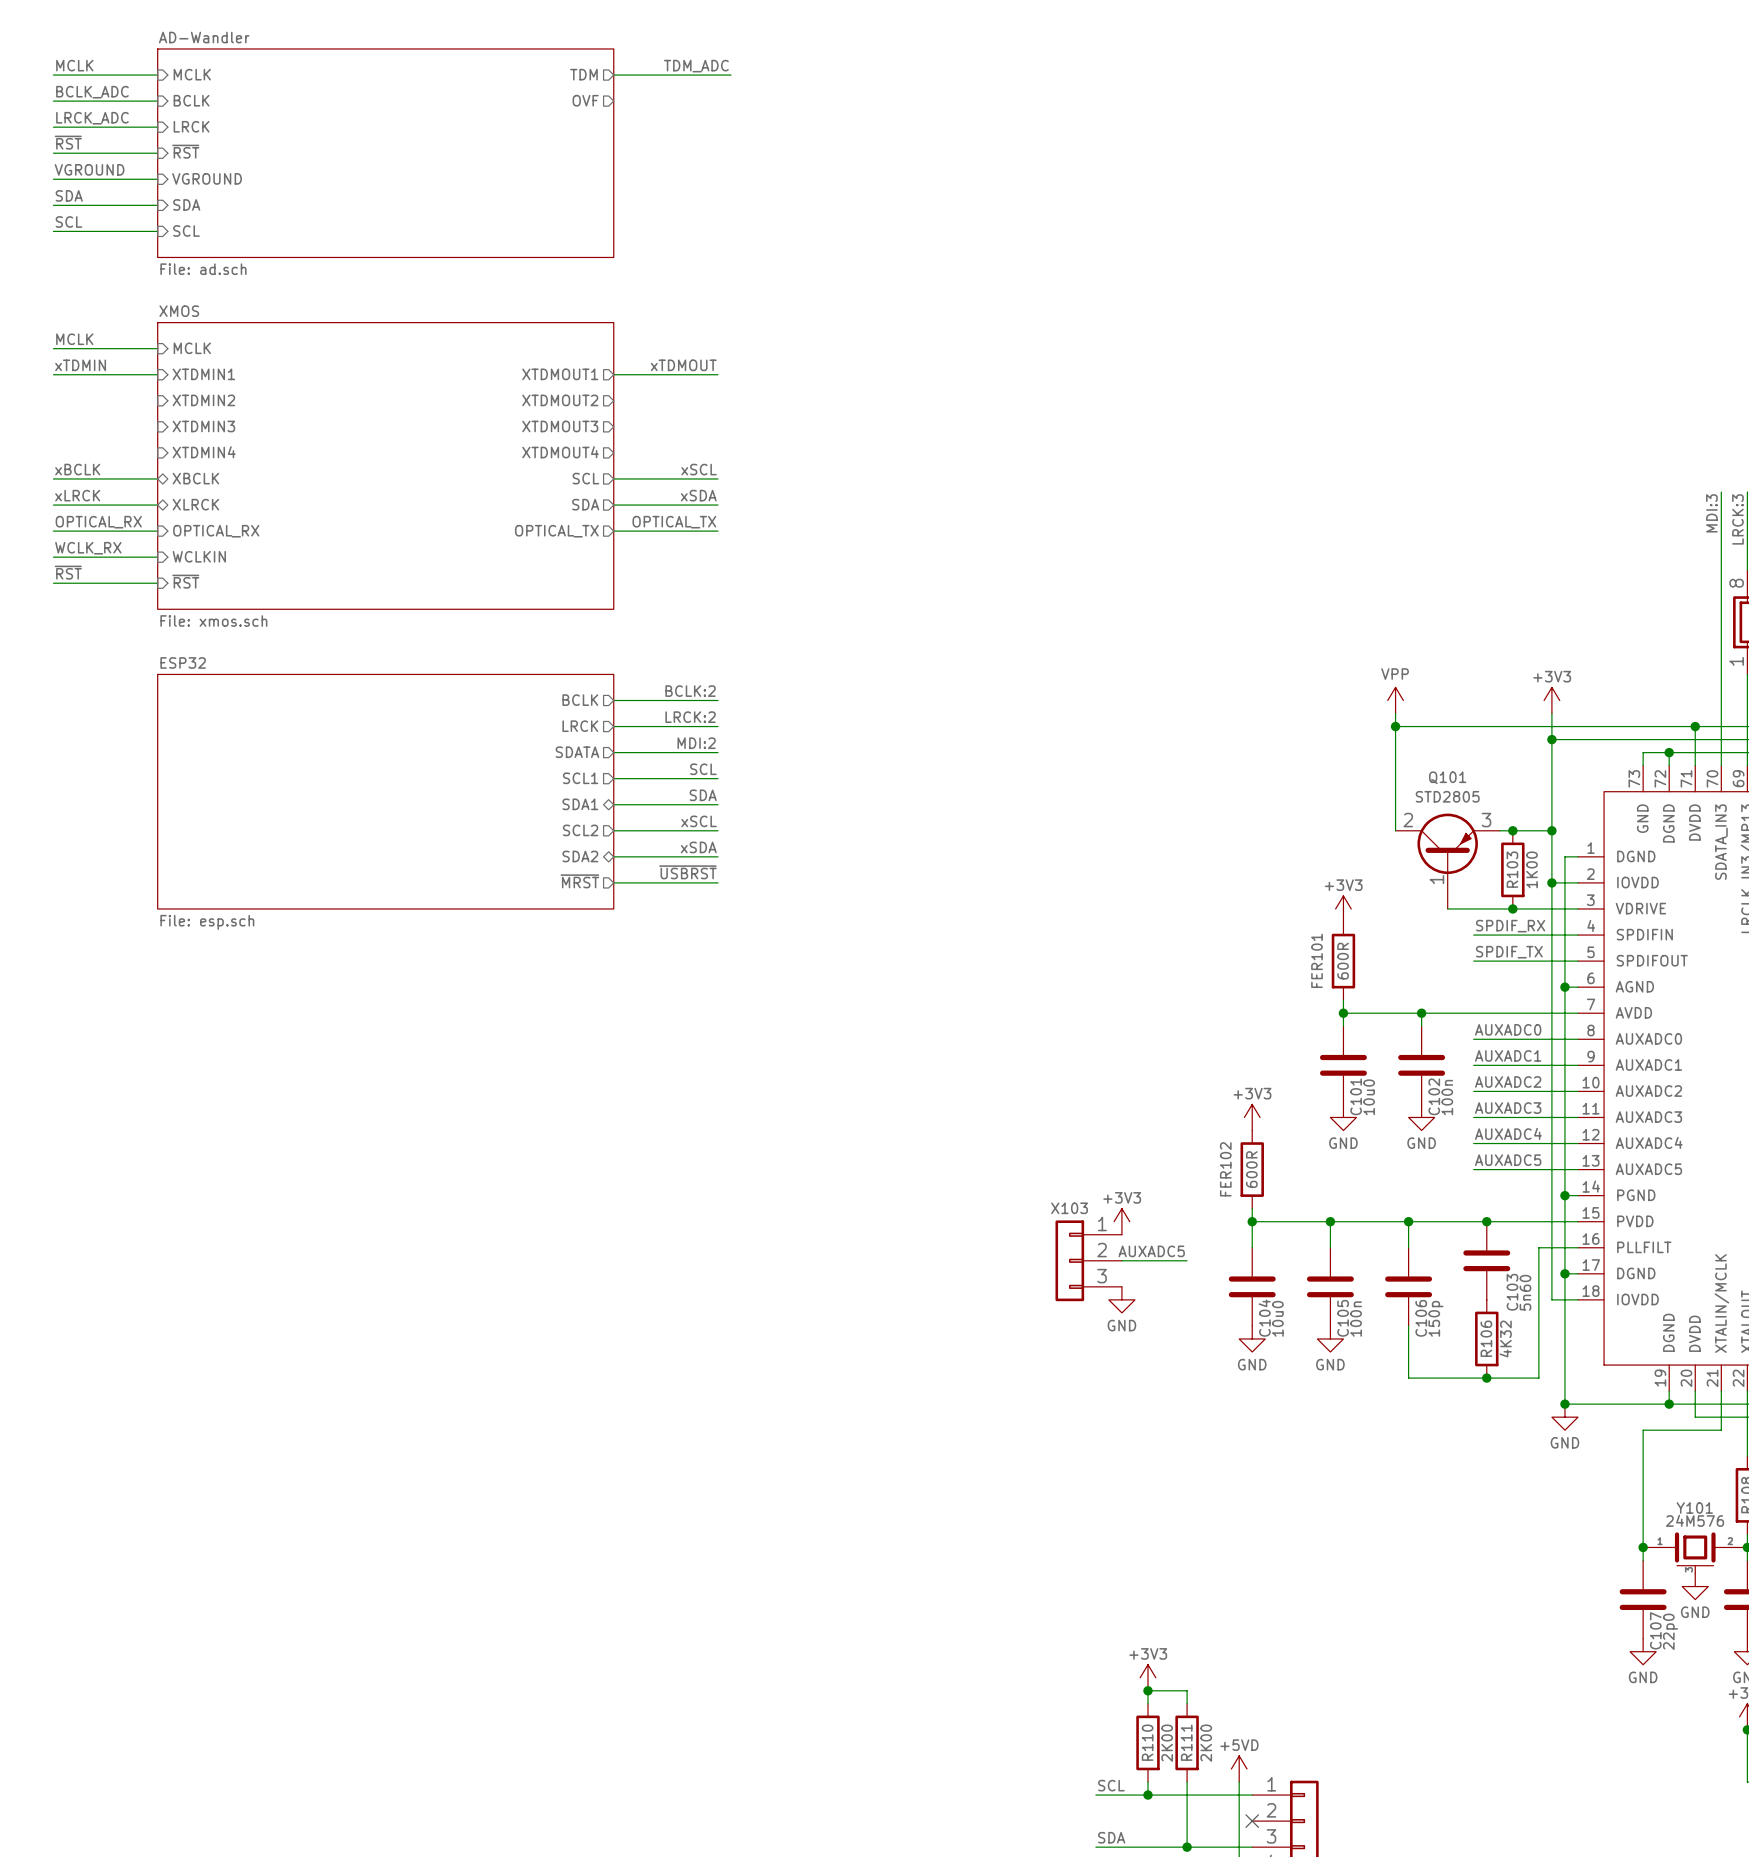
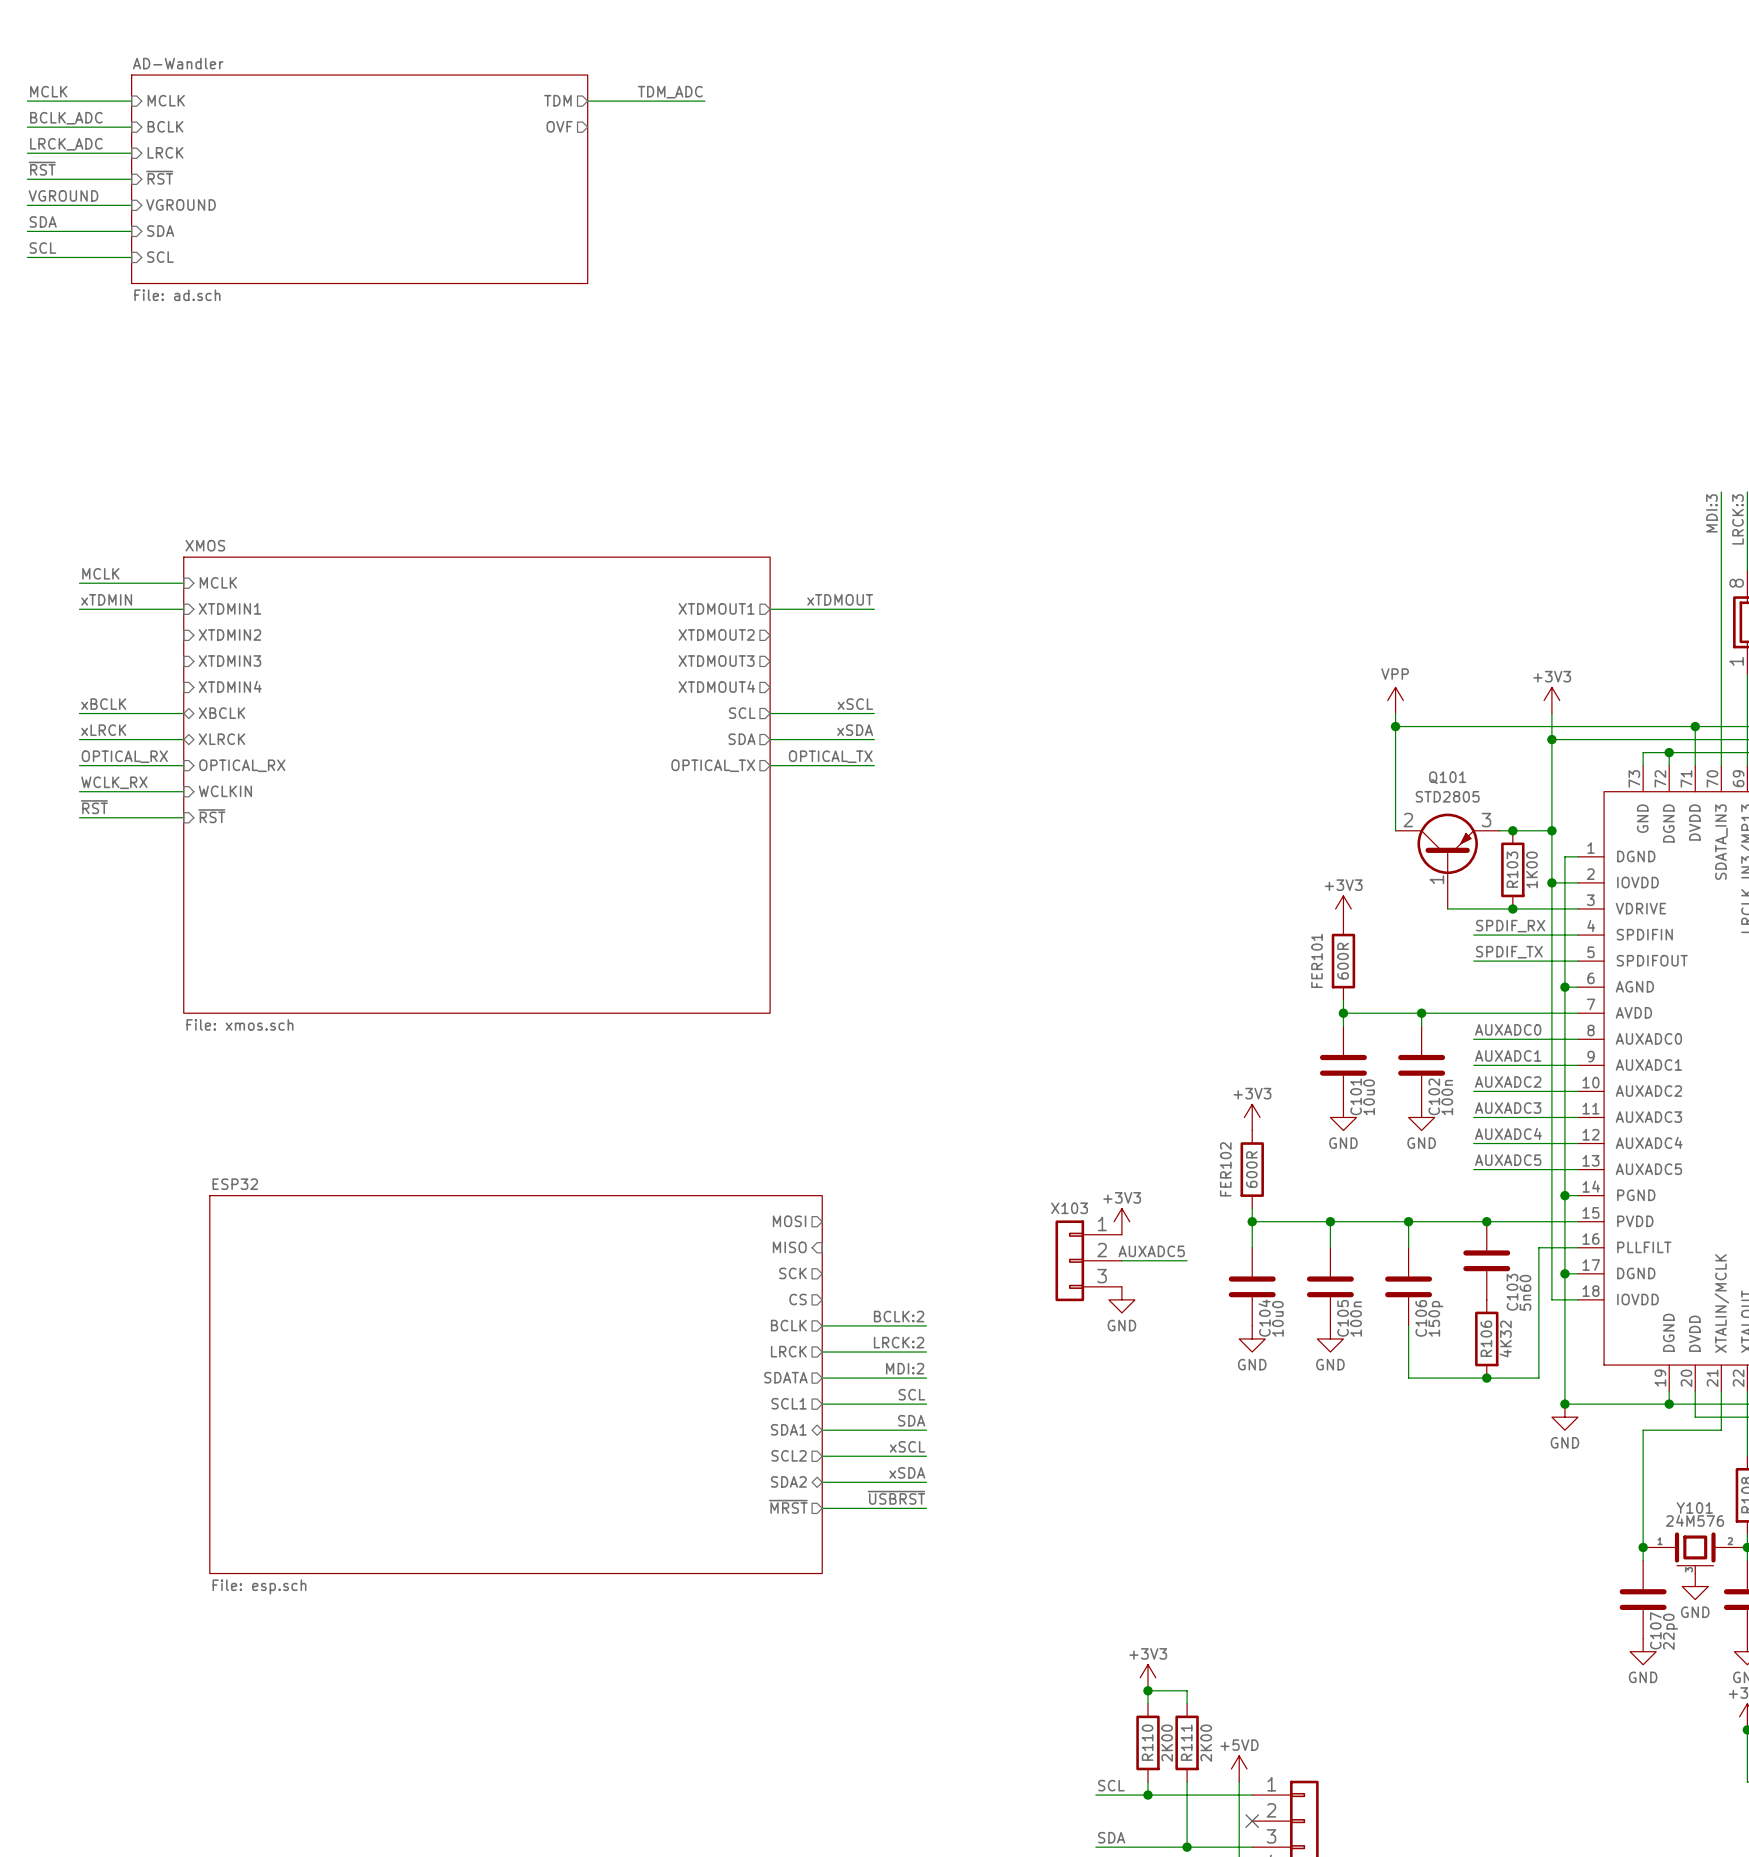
label position: MCLK (74, 65) -> MCLK (48, 91)
label position: TDM_ADC (696, 66) -> TDM_ADC (670, 92)
sheet pin position: MCLK (192, 74) -> MCLK (166, 100)
sheet pin position: TDM (583, 74) -> TDM (557, 100)
wire: (53, 75) (157, 75) -> none
wire: (613, 75) (731, 75) -> (587, 101) (704, 101)
label position: BCLK_ADC (92, 92) -> BCLK_ADC (66, 118)
sheet pin position: BCLK (191, 100) -> BCLK (165, 126)
sheet pin position: OVF (585, 100) -> OVF (559, 126)
wire: (131, 101) (157, 101) -> (27, 101) (53, 101)
label position: LRCK_ADC (92, 118) -> LRCK_ADC (66, 144)
sheet pin position: LRCK (191, 126) -> LRCK (165, 152)
wire: (131, 127) (157, 127) -> (27, 127) (53, 127)
label position: ~{RST} (68, 142) -> ~{RST} (42, 168)
sheet pin position: ~{RST} (185, 151) -> ~{RST} (159, 177)
wire: (131, 153) (157, 153) -> (27, 153) (53, 153)
sheet AD-Wandler position: (385, 153) -> (359, 179)
label position: VGROUND (89, 169) -> VGROUND (63, 195)
sheet pin position: VGROUND (207, 178) -> VGROUND (180, 204)
wire: (131, 179) (157, 179) -> (27, 179) (53, 179)
label position: SDA (69, 195) -> SDA (43, 221)
sheet pin position: SDA (186, 204) -> SDA (160, 231)
wire: (131, 205) (157, 205) -> (27, 205) (53, 205)
label position: SCL (68, 221) -> SCL (42, 248)
wire: (131, 231) (157, 231) -> (27, 231) (53, 231)
sheet pin position: SCL (186, 231) -> SCL (160, 257)
label: MCLK (74, 339) -> none
wire: (53, 348) (157, 348) -> (27, 257) (131, 257)
sheet pin: MCLK (192, 348) -> none
label position: xTDMIN (80, 365) -> xTDMIN (106, 599)
label: xTDMOUT (683, 365) -> none
wire: (53, 374) (157, 374) -> (79, 609) (183, 609)
sheet pin position: XTDMIN1 (203, 374) -> XTDMIN1 (229, 608)
sheet pin: XTDMOUT1 (560, 374) -> none
wire: (613, 374) (717, 374) -> none
sheet pin position: XTDMIN2 (203, 400) -> XTDMIN2 (229, 634)
sheet pin: XTDMOUT2 (560, 400) -> none
sheet pin position: XTDMIN3 (203, 426) -> XTDMIN3 (229, 661)
sheet pin: XTDMOUT3 (560, 426) -> none
sheet pin position: XTDMIN4 (204, 452) -> XTDMIN4 (230, 686)
sheet pin: XTDMOUT4 (560, 452) -> none
sheet XMOS: File: xmos.sch (385, 465) -> none
label position: xBCLK (77, 469) -> xBCLK (103, 704)
label: xSCL (699, 469) -> none
wire: (53, 478) (157, 478) -> (79, 713) (183, 713)
sheet pin position: XBCLK (195, 478) -> XBCLK (221, 713)
sheet pin: SCL (585, 478) -> none
wire: (613, 478) (717, 478) -> none
label position: xLRCK (77, 495) -> xLRCK (103, 730)
label: xSDA (698, 495) -> none
sheet pin position: XLRCK (195, 504) -> XLRCK (221, 739)
sheet pin: SDA (585, 504) -> none
wire: (53, 505) (157, 505) -> (79, 739) (183, 739)
wire: (613, 505) (717, 505) -> none
label position: OPTICAL_RX (98, 522) -> OPTICAL_RX (124, 756)
label: OPTICAL_TX (674, 522) -> none
wire: (53, 531) (157, 531) -> (79, 765) (183, 765)
sheet pin position: OPTICAL_RX (216, 531) -> OPTICAL_RX (242, 765)
sheet pin: OPTICAL_TX (556, 531) -> none
wire: (613, 531) (717, 531) -> none
label position: WCLK_RX (88, 548) -> WCLK_RX (114, 782)
sheet pin position: WCLKIN (199, 556) -> WCLKIN (225, 791)
wire: (53, 557) (157, 557) -> (79, 791) (183, 791)
label: ~{RST} (68, 572) -> none
label: none -> MCLK (100, 573)
sheet pin: ~{RST} (185, 581) -> none
sheet pin: none -> MCLK (218, 582)
wire: (53, 583) (79, 583) -> (157, 583) (183, 583)
label: none -> xTDMOUT (840, 599)
sheet pin: none -> XTDMOUT1 (716, 608)
sheet pin: none -> XTDMOUT2 (716, 634)
sheet pin: none -> XTDMOUT3 (716, 661)
sheet ESP32 name position: ESP32 (183, 662) -> ESP32 (235, 1184)
sheet ESP32 shape: [157, 674, 614, 909] -> [209, 1195, 823, 1574]
sheet pin: none -> XTDMOUT4 (716, 686)
label: BCLK:2 (690, 691) -> none
sheet pin: BCLK (580, 700) -> none
wire: (613, 700) (717, 700) -> (770, 609) (874, 609)
label: none -> xSCL (855, 704)
sheet pin: none -> SCL (742, 713)
label: LRCK:2 (690, 717) -> none
sheet pin: LRCK (580, 726) -> none
wire: (613, 726) (717, 726) -> none
label: none -> xSDA (855, 730)
sheet pin: none -> SDA (742, 739)
label: MDI:2 (696, 743) -> none
sheet pin: SDATA (577, 752) -> none
wire: (613, 752) (717, 752) -> none
label: none -> OPTICAL_TX (830, 756)
sheet pin: none -> OPTICAL_TX (713, 765)
label: SCL (703, 769) -> none
sheet pin: SCL1 (580, 778) -> none
wire: (613, 778) (717, 778) -> none
sheet XMOS: none -> File: xmos.sch (476, 785)
label: SDA (703, 795) -> none
sheet pin: SDA1 (580, 804) -> none
wire: (613, 804) (717, 804) -> (770, 713) (874, 713)
label: none -> ~{RST} (94, 807)
sheet pin: none -> ~{RST} (211, 816)
wire: none -> (79, 817) (183, 817)
label: xSCL (699, 821) -> none
sheet pin: SCL2 (580, 830) -> none
wire: (613, 830) (717, 830) -> (770, 739) (874, 739)
label: xSDA (698, 847) -> none
sheet pin: SDA2 (580, 856) -> none
wire: (613, 856) (717, 856) -> (770, 765) (874, 765)
label: ~{USBRST} (687, 872) -> none
sheet pin: ~{MRST} (579, 881) -> none
wire: (613, 882) (717, 882) -> none
sheet ESP32 value position: File: esp.sch (207, 922) -> File: esp.sch (259, 1586)
sheet pin: none -> MOSI (789, 1221)
sheet pin: none -> MISO (789, 1247)
sheet pin: none -> SCK (792, 1273)
sheet pin: none -> CS (798, 1299)
label: none -> BCLK:2 (899, 1316)
sheet pin: none -> BCLK (788, 1325)
wire: none -> (822, 1325) (926, 1325)
label: none -> LRCK:2 (899, 1342)
sheet pin: none -> LRCK (788, 1351)
wire: none -> (822, 1352) (926, 1352)
label: none -> MDI:2 (905, 1368)
sheet pin: none -> SDATA (785, 1377)
wire: none -> (822, 1378) (926, 1378)
label: none -> SCL (911, 1394)
sheet pin: none -> SCL1 (789, 1403)
wire: none -> (822, 1404) (926, 1404)
label: none -> SDA (911, 1420)
sheet pin: none -> SDA1 (788, 1429)
wire: none -> (822, 1430) (926, 1430)
label: none -> xSCL (907, 1446)
sheet pin: none -> SCL2 (789, 1455)
wire: none -> (822, 1456) (926, 1456)
label: none -> xSDA (907, 1472)
sheet pin: none -> SDA2 (788, 1481)
wire: none -> (822, 1482) (926, 1482)
label: none -> ~{USBRST} (896, 1497)
sheet pin: none -> ~{MRST} (788, 1506)
wire: none -> (822, 1508) (926, 1508)

